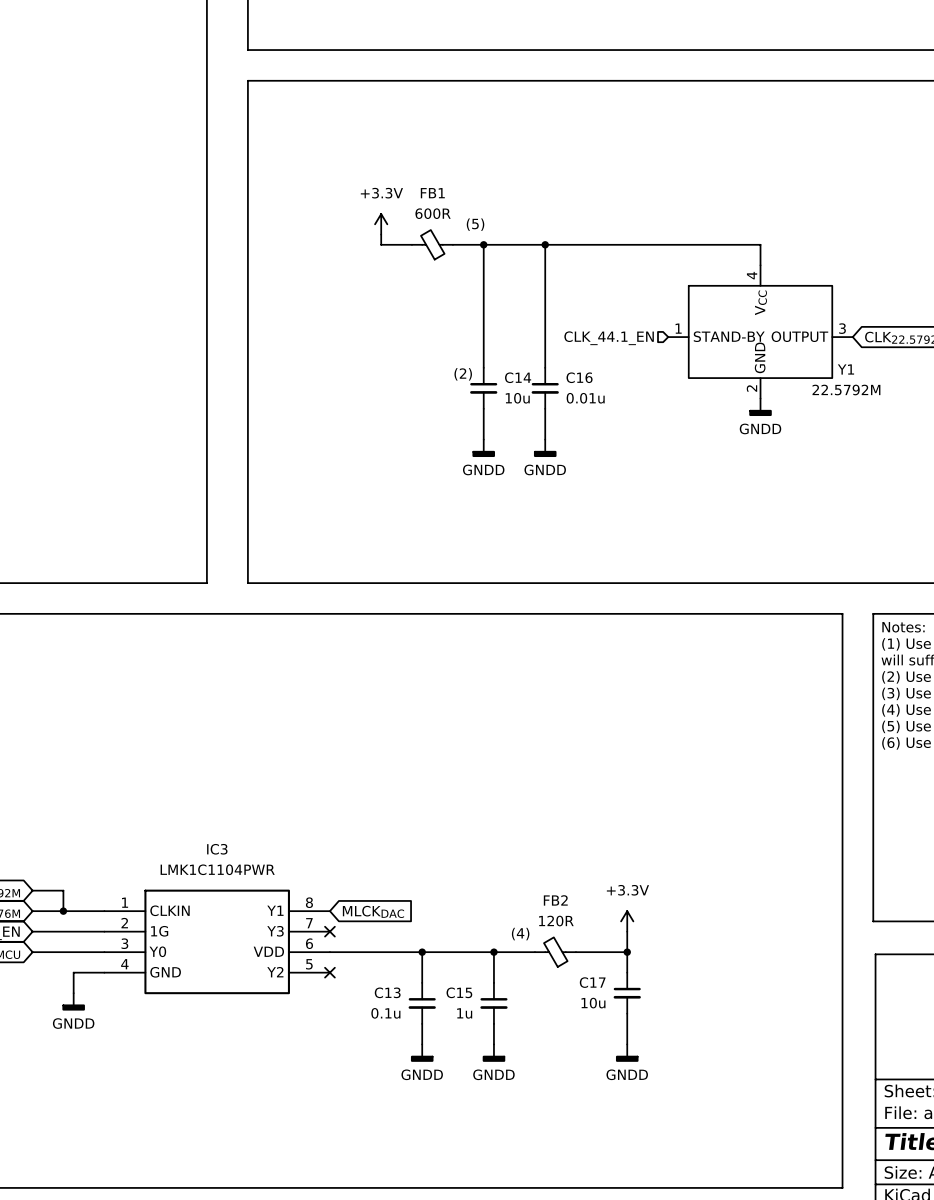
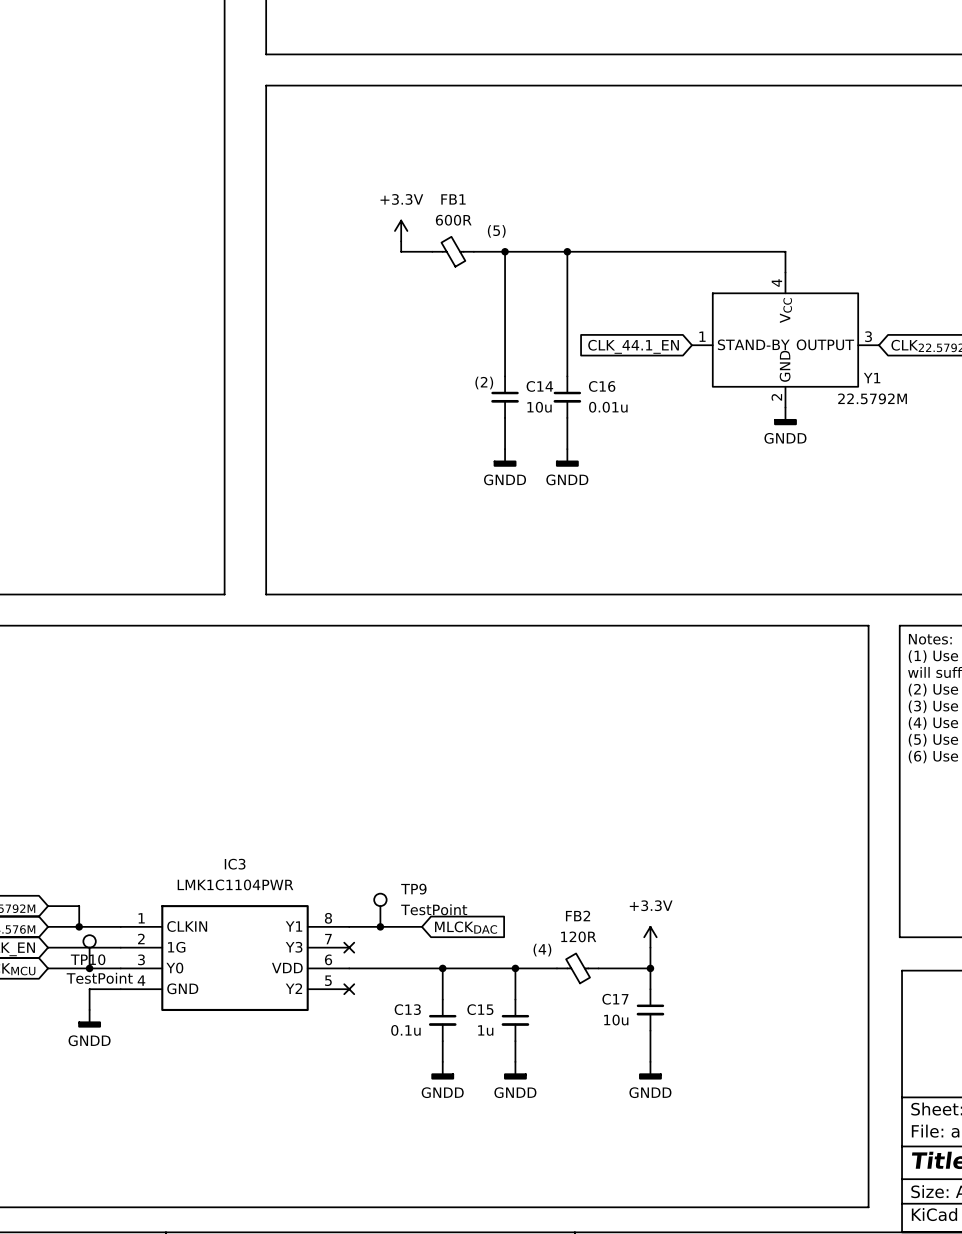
hierarchical label: CLK_44.1_EN (609, 338) -> none
global label: none -> CLK_44.1_EN (633, 346)
TP9: none -> TestPoint (380, 910)
wire: none -> (349, 926) (421, 926)
junction: none -> (380, 926)
global label position: MLCKDAC (373, 911) -> MLCKDAC (466, 927)
TP10: none -> TestPoint (89, 951)
junction: none -> (89, 968)

